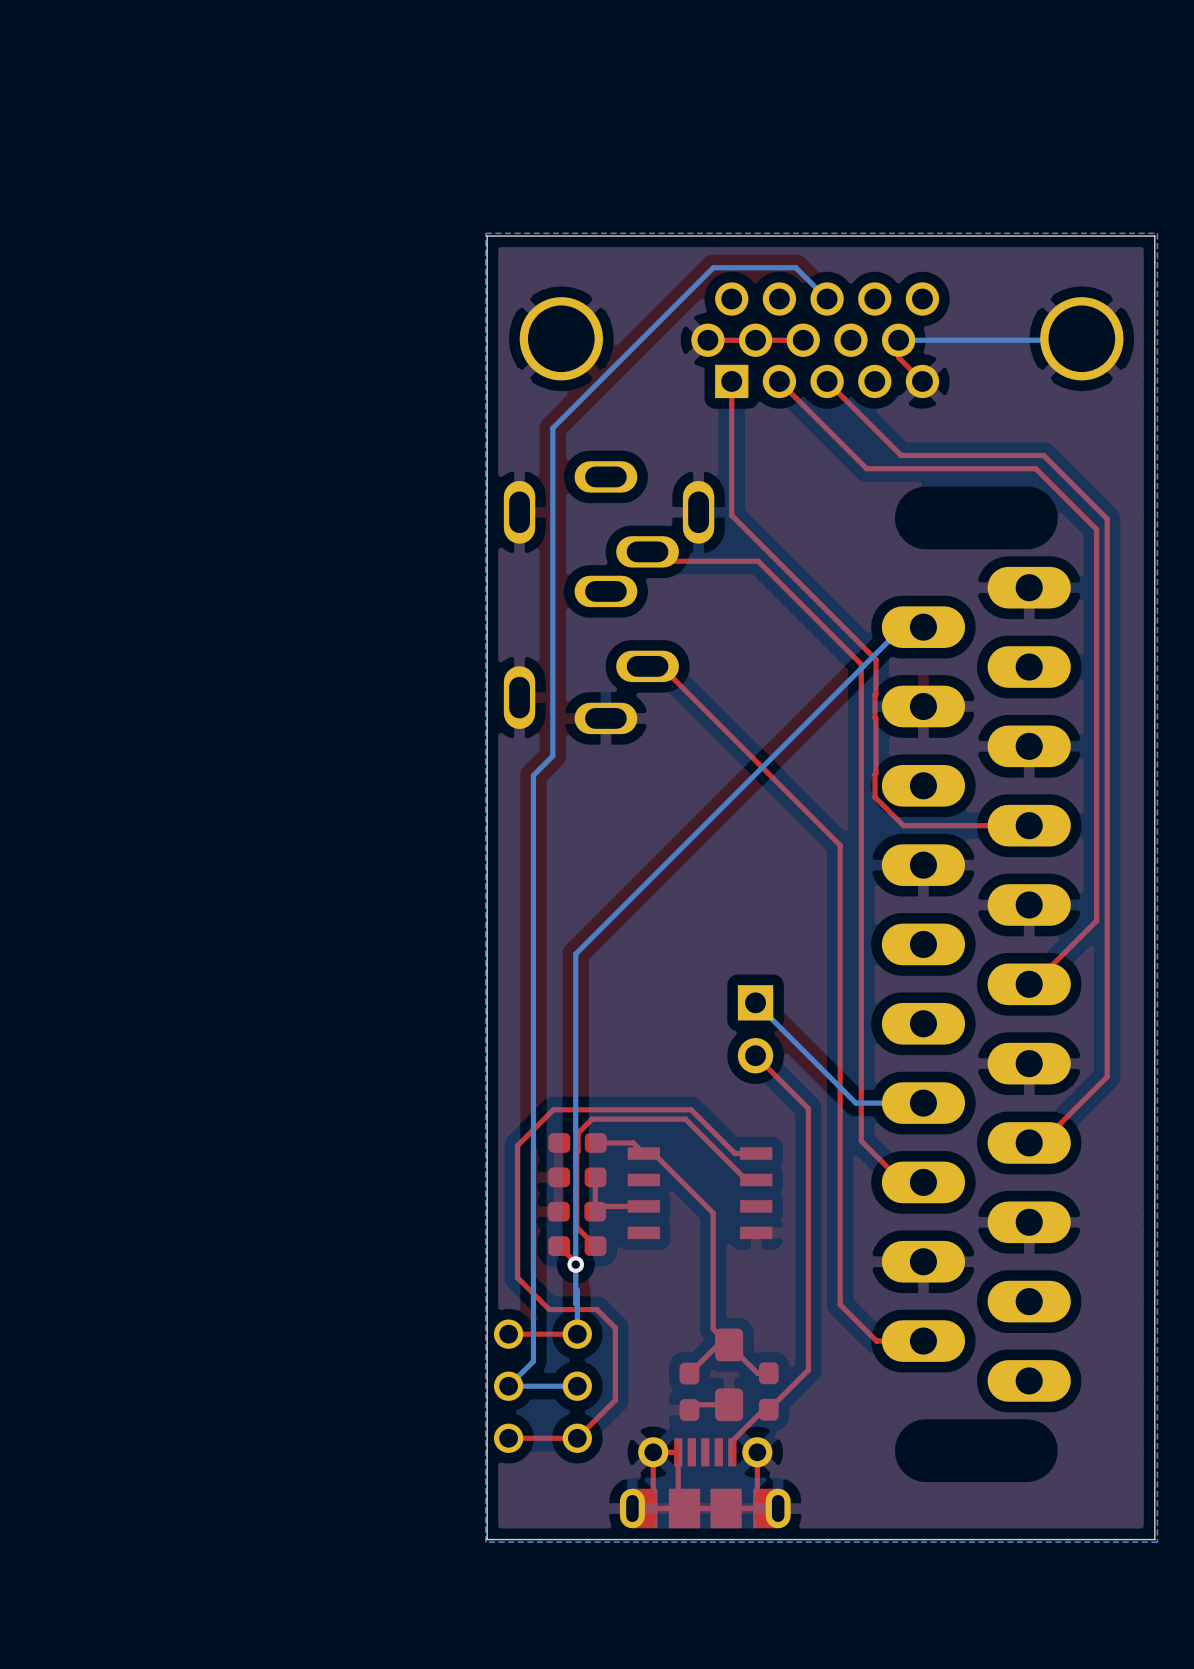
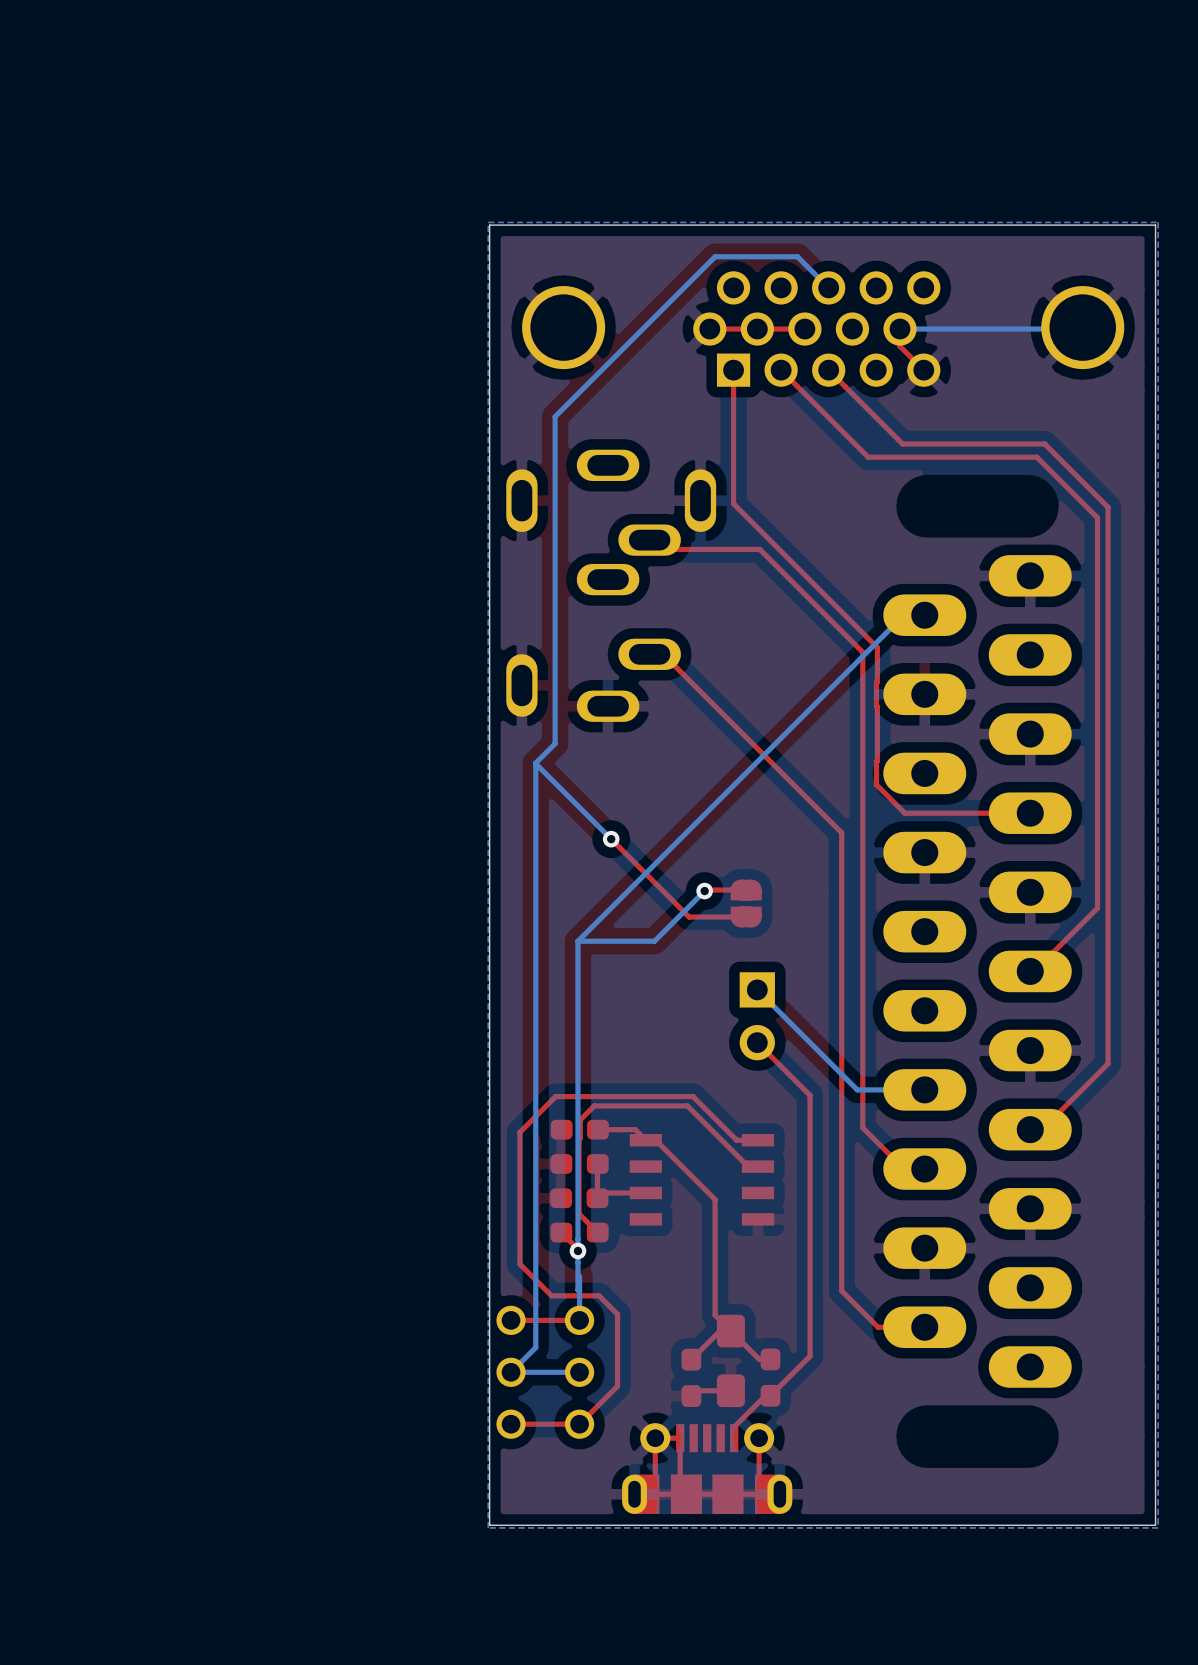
bottom track: none -> (535, 763) (611, 839)
top track: none -> (611, 839) (689, 917) (746, 917)
via: none -> (611, 839)
top track: none -> (746, 890) (704, 891)
bottom track: none -> (704, 891) (654, 941) (577, 941)
via: none -> (704, 891)
part: none -> (746, 903)

